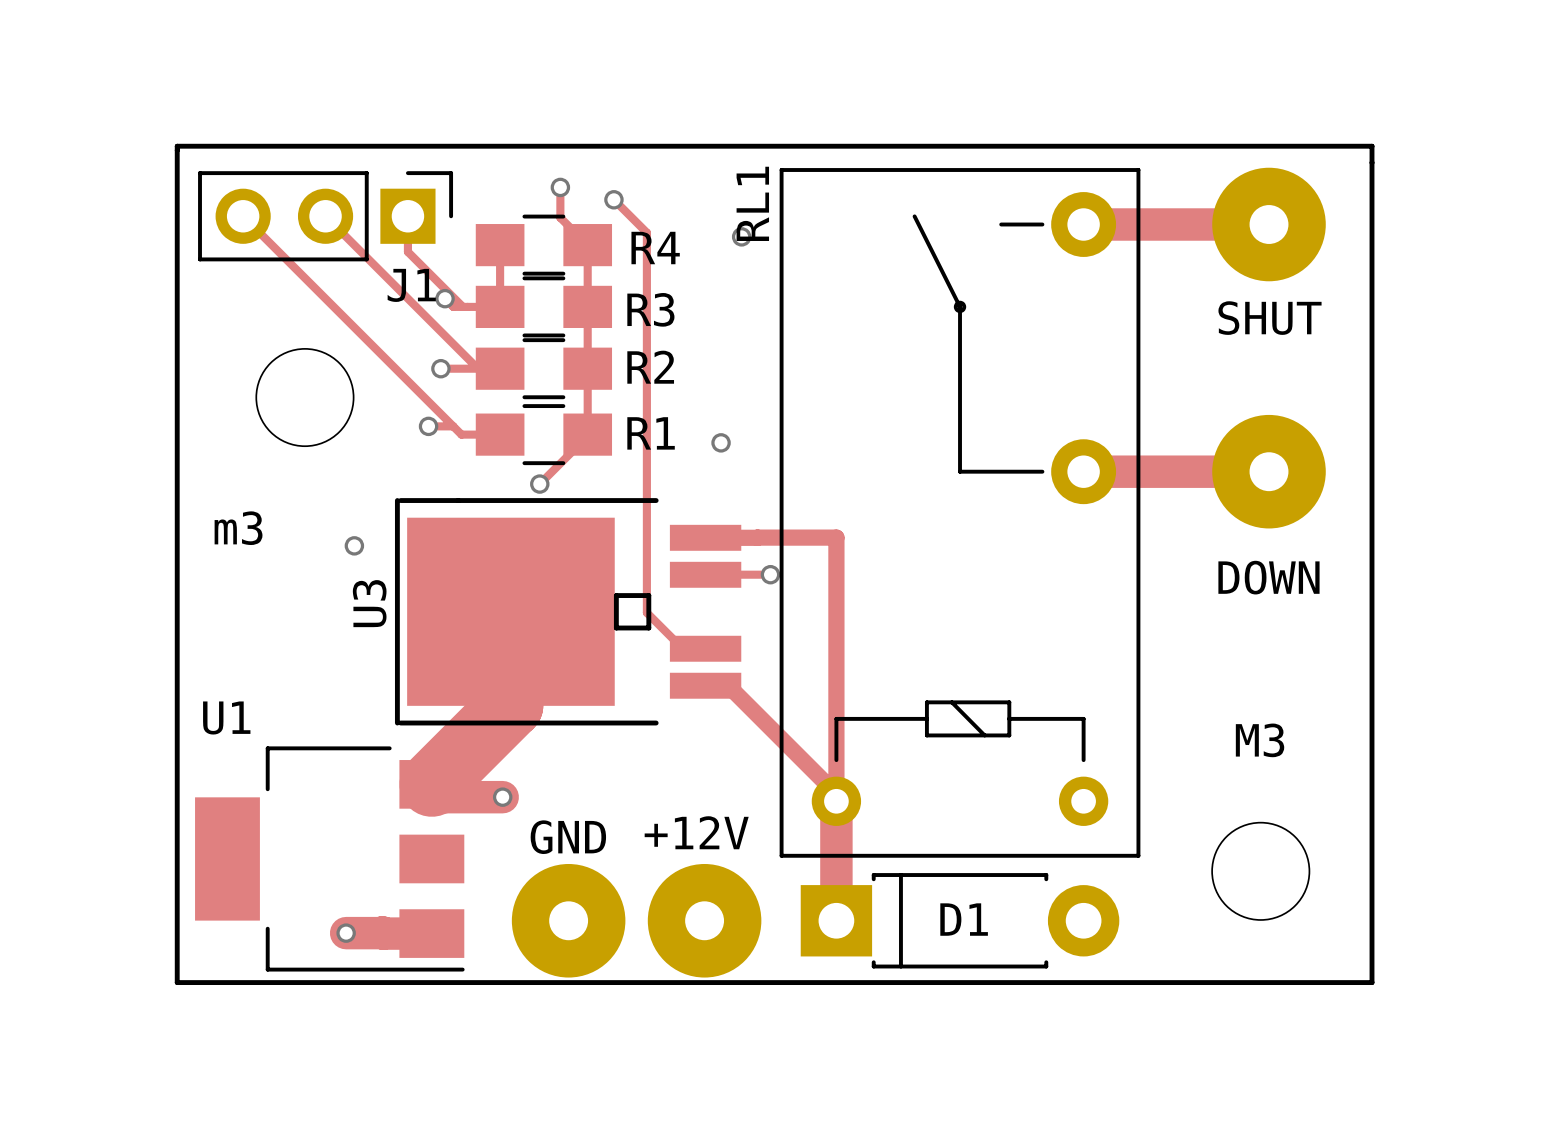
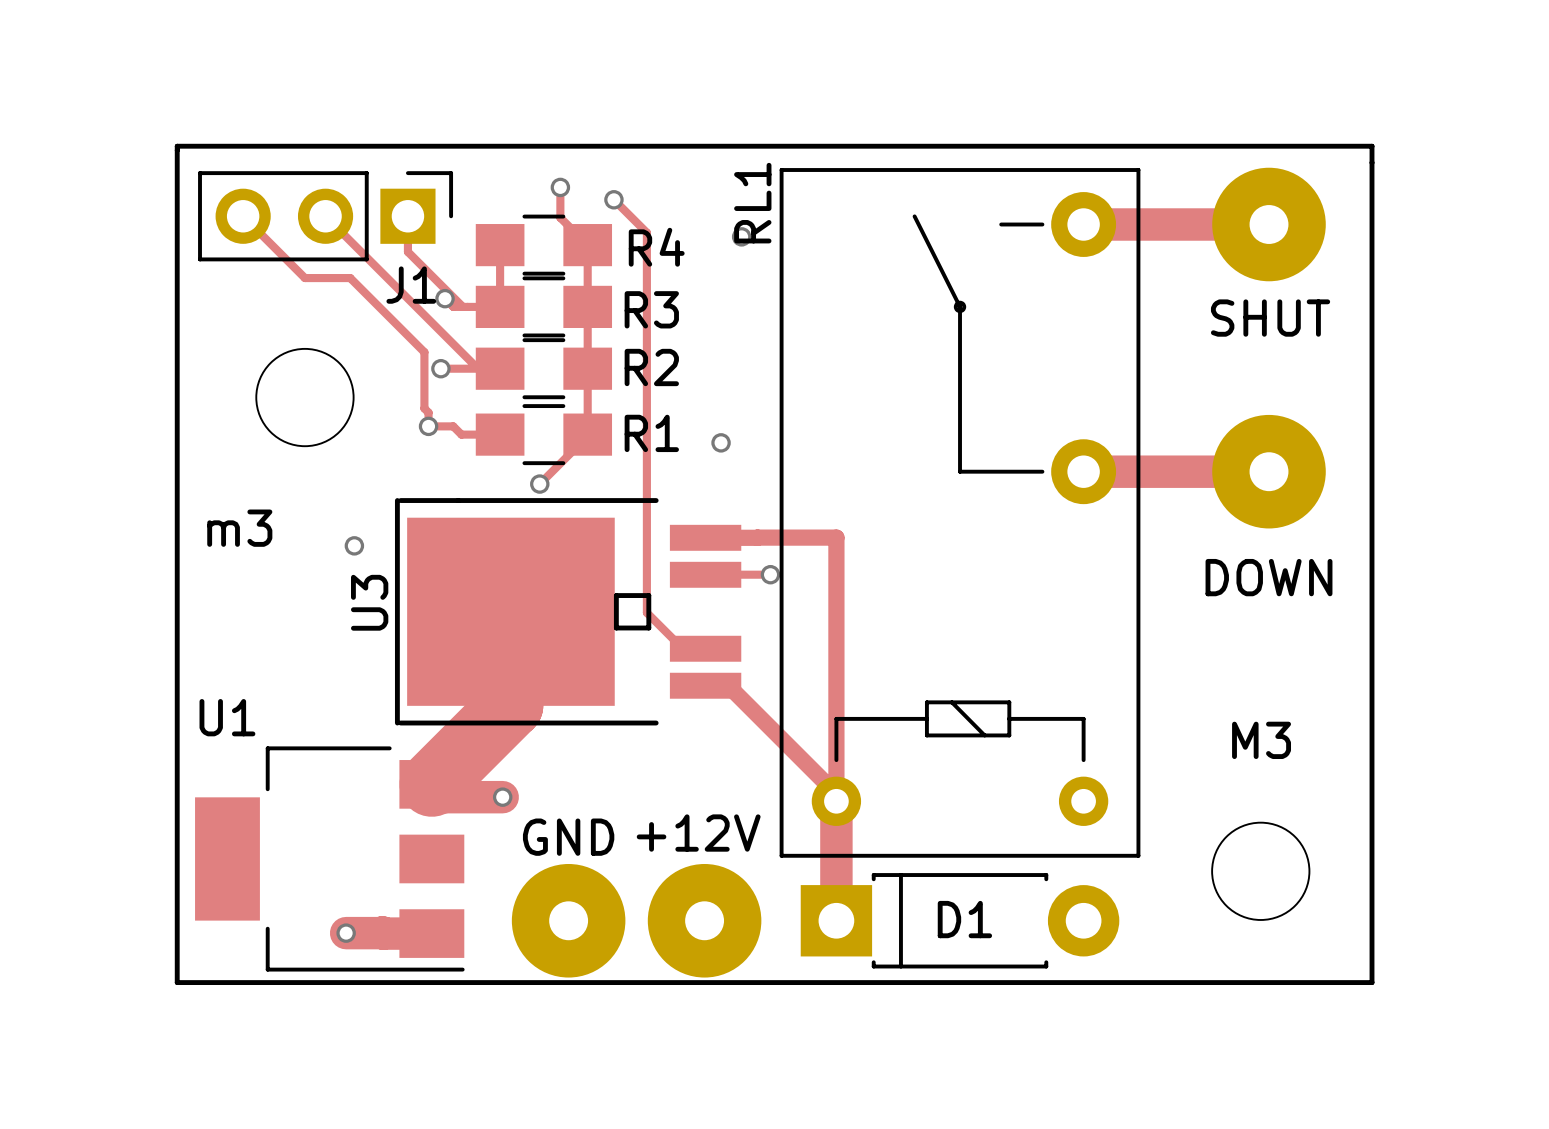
track: (304, 278) (453, 426) -> (304, 278) (350, 278) (424, 352) (424, 408) (428, 412) (428, 426)

